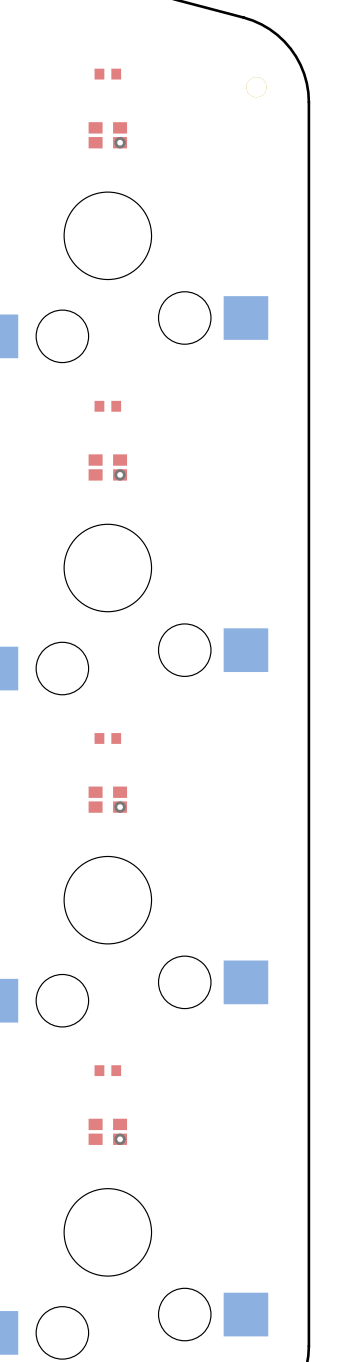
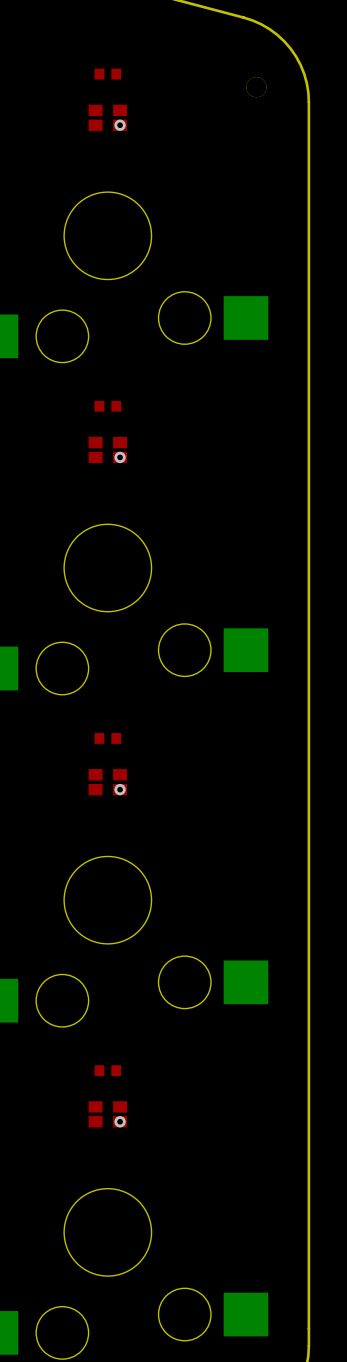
part position: (107, 135) -> (107, 117)
via position: (120, 142) -> (120, 125)
part position: (107, 467) -> (107, 449)
via position: (120, 474) -> (120, 457)
part position: (107, 799) -> (107, 782)
via position: (120, 807) -> (120, 789)
part position: (107, 1131) -> (107, 1114)
via position: (120, 1139) -> (120, 1121)

